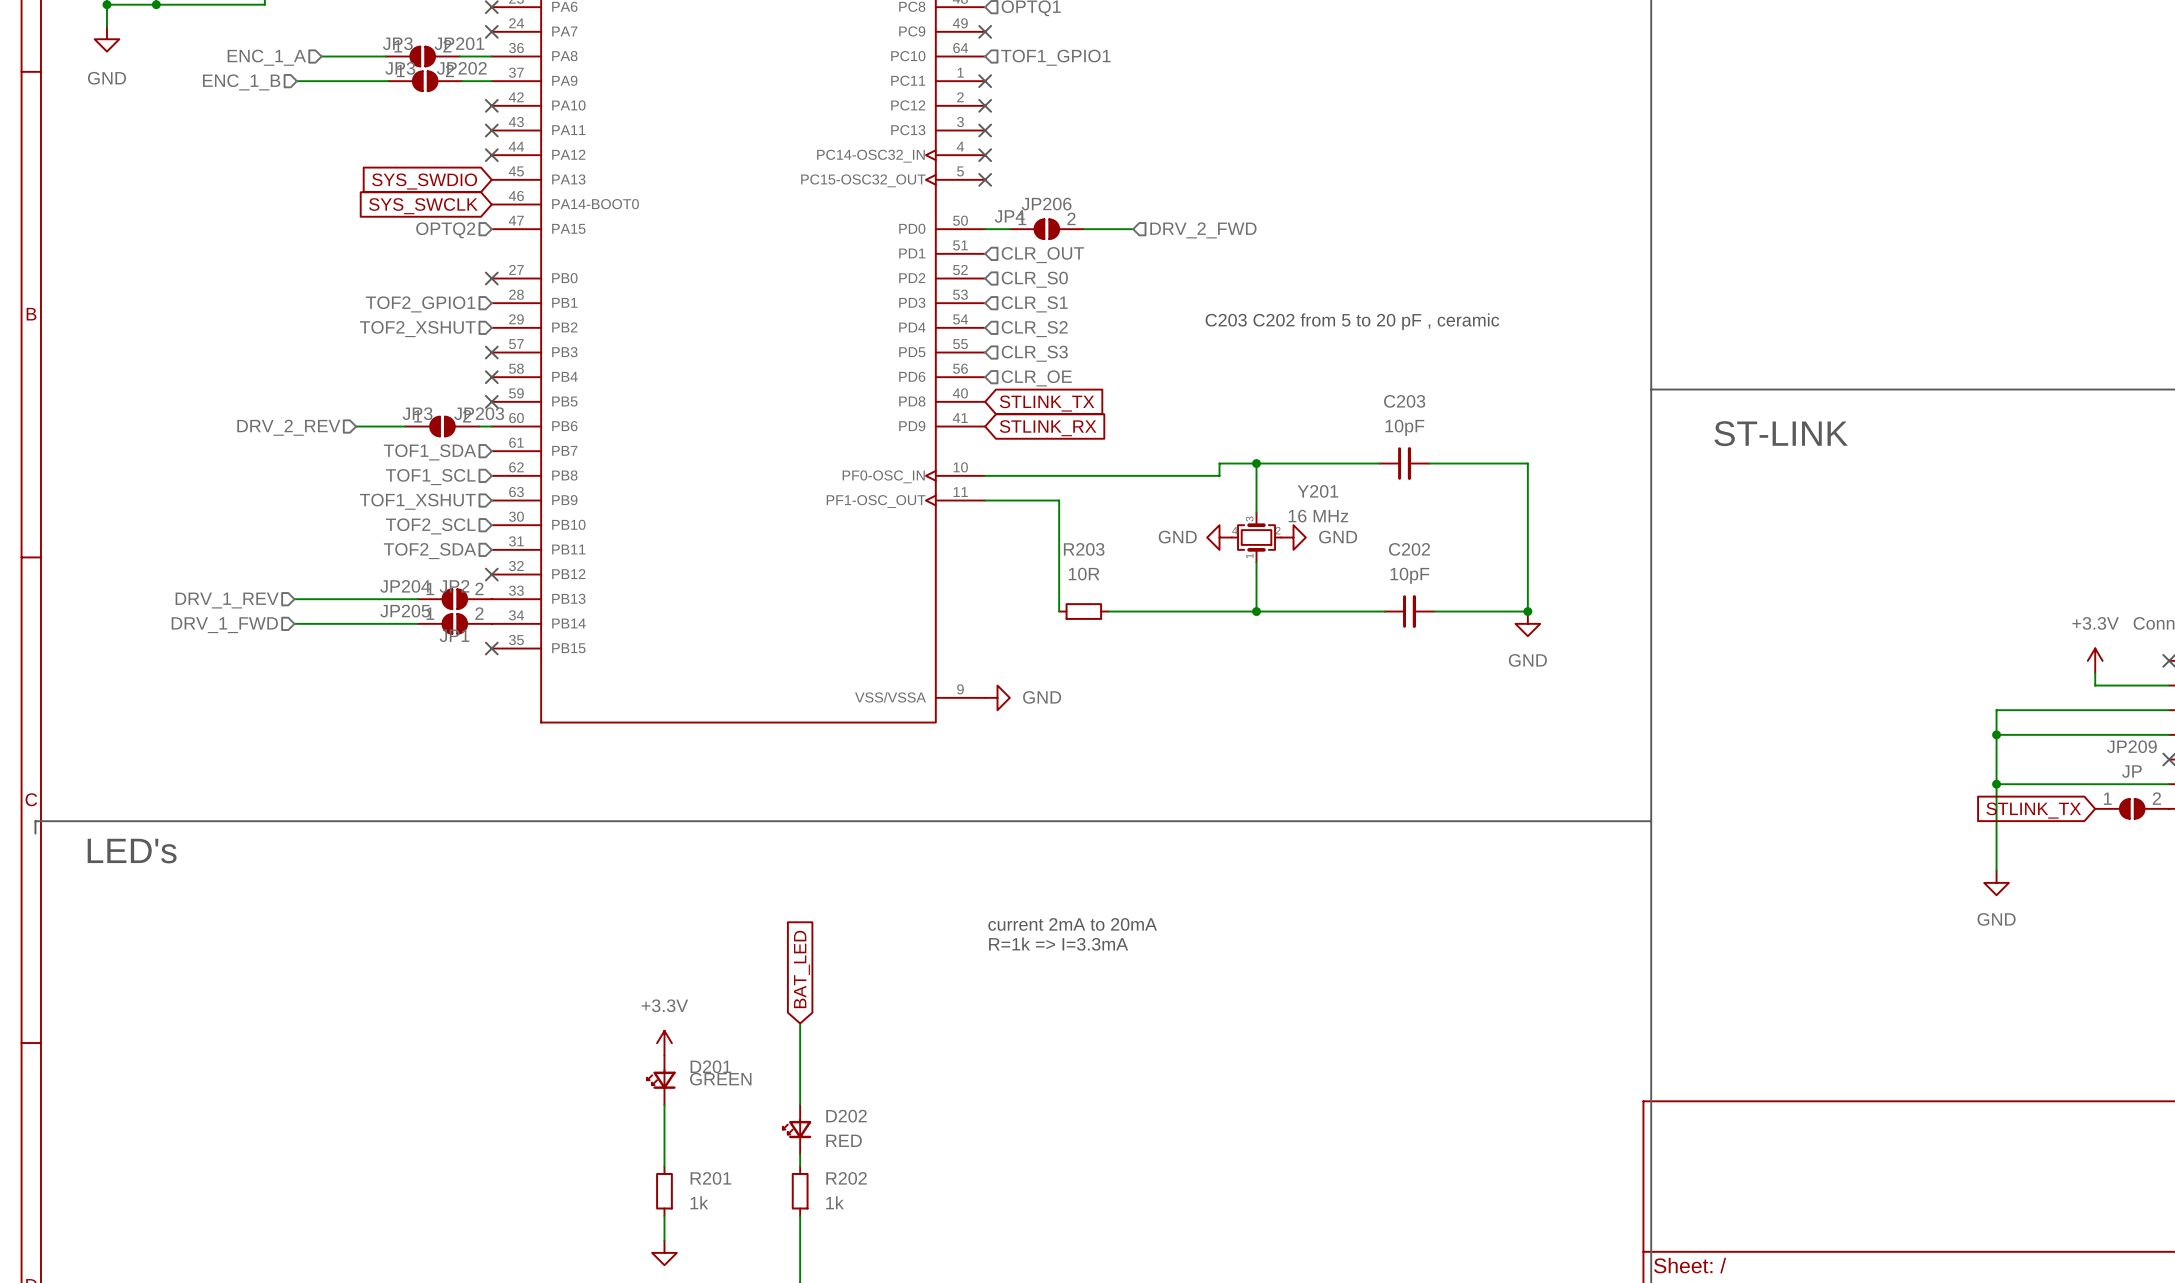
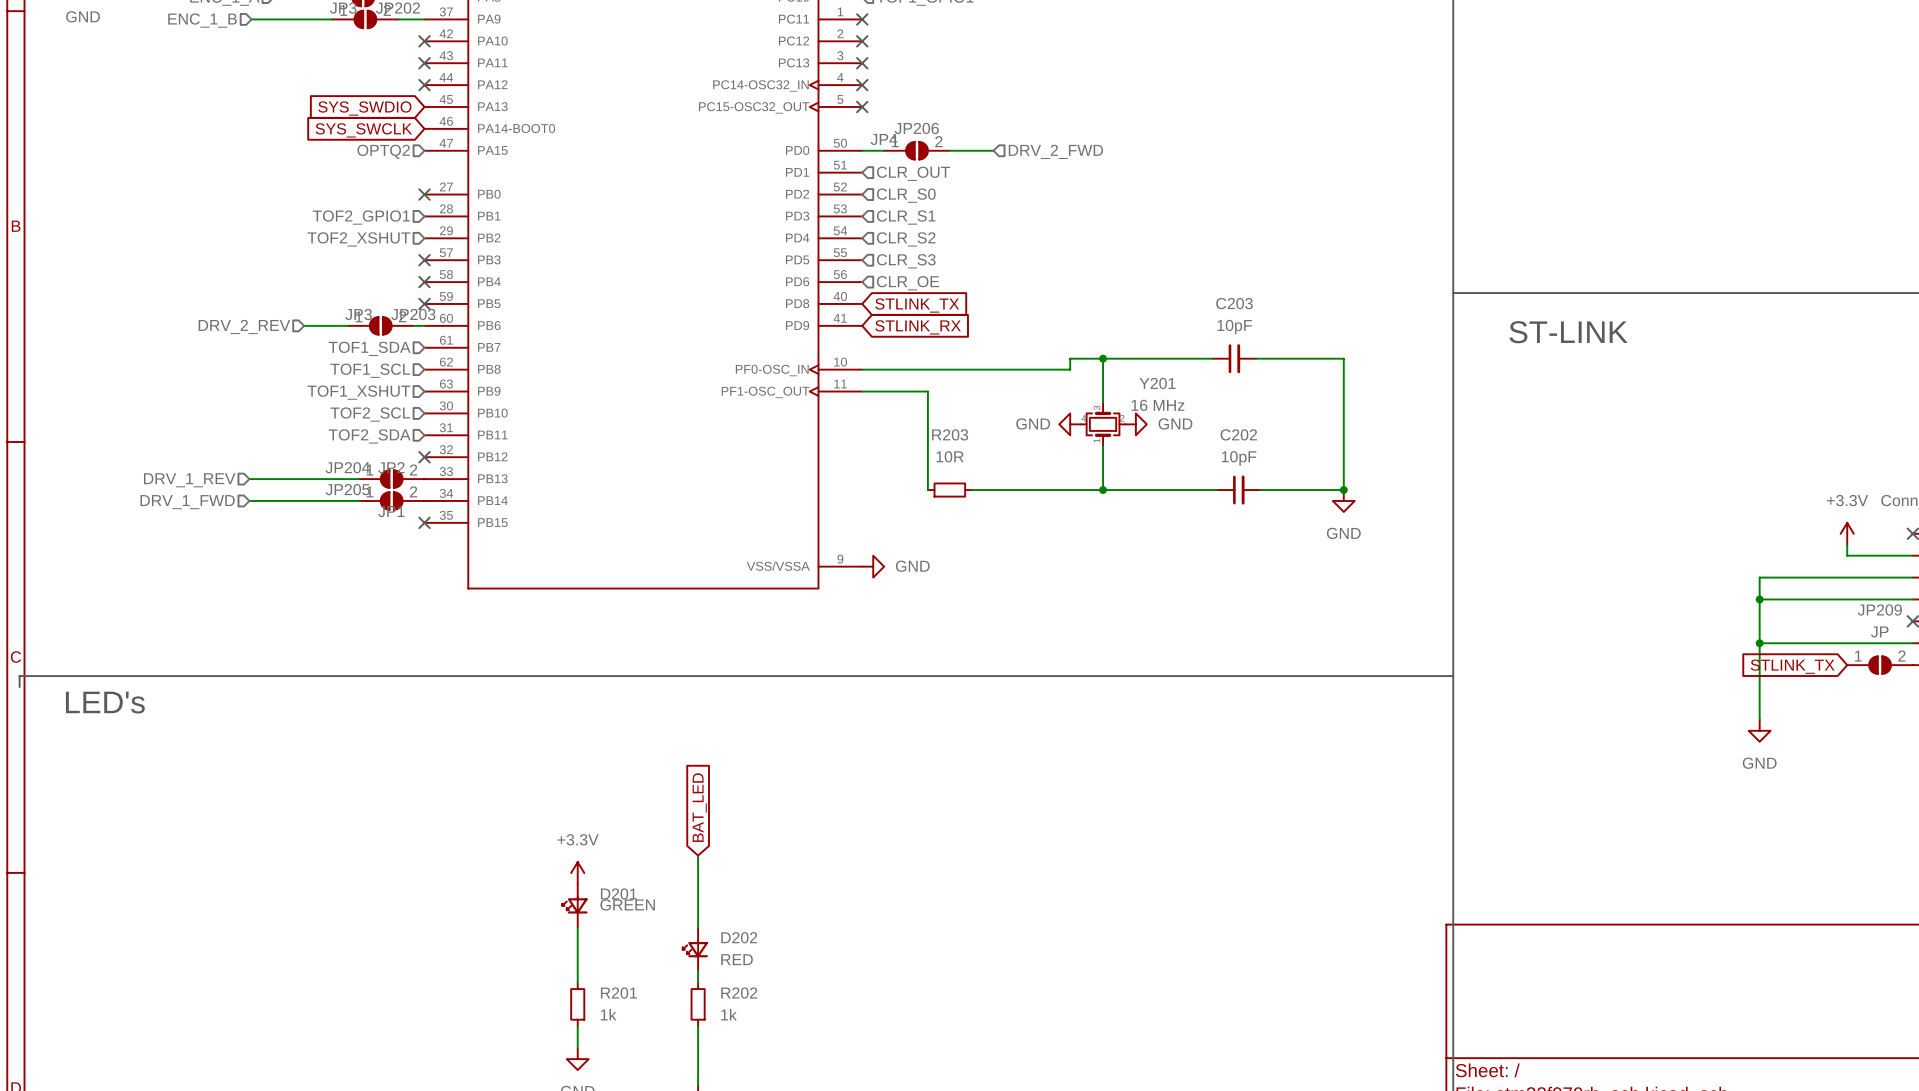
text: C203 C202 from 5 to 20 pF , ceramic (1352, 321) -> none
text: current 2mA to 20mA (1072, 924) -> none
text: R=1k => I=3.3mA (1058, 944) -> none

